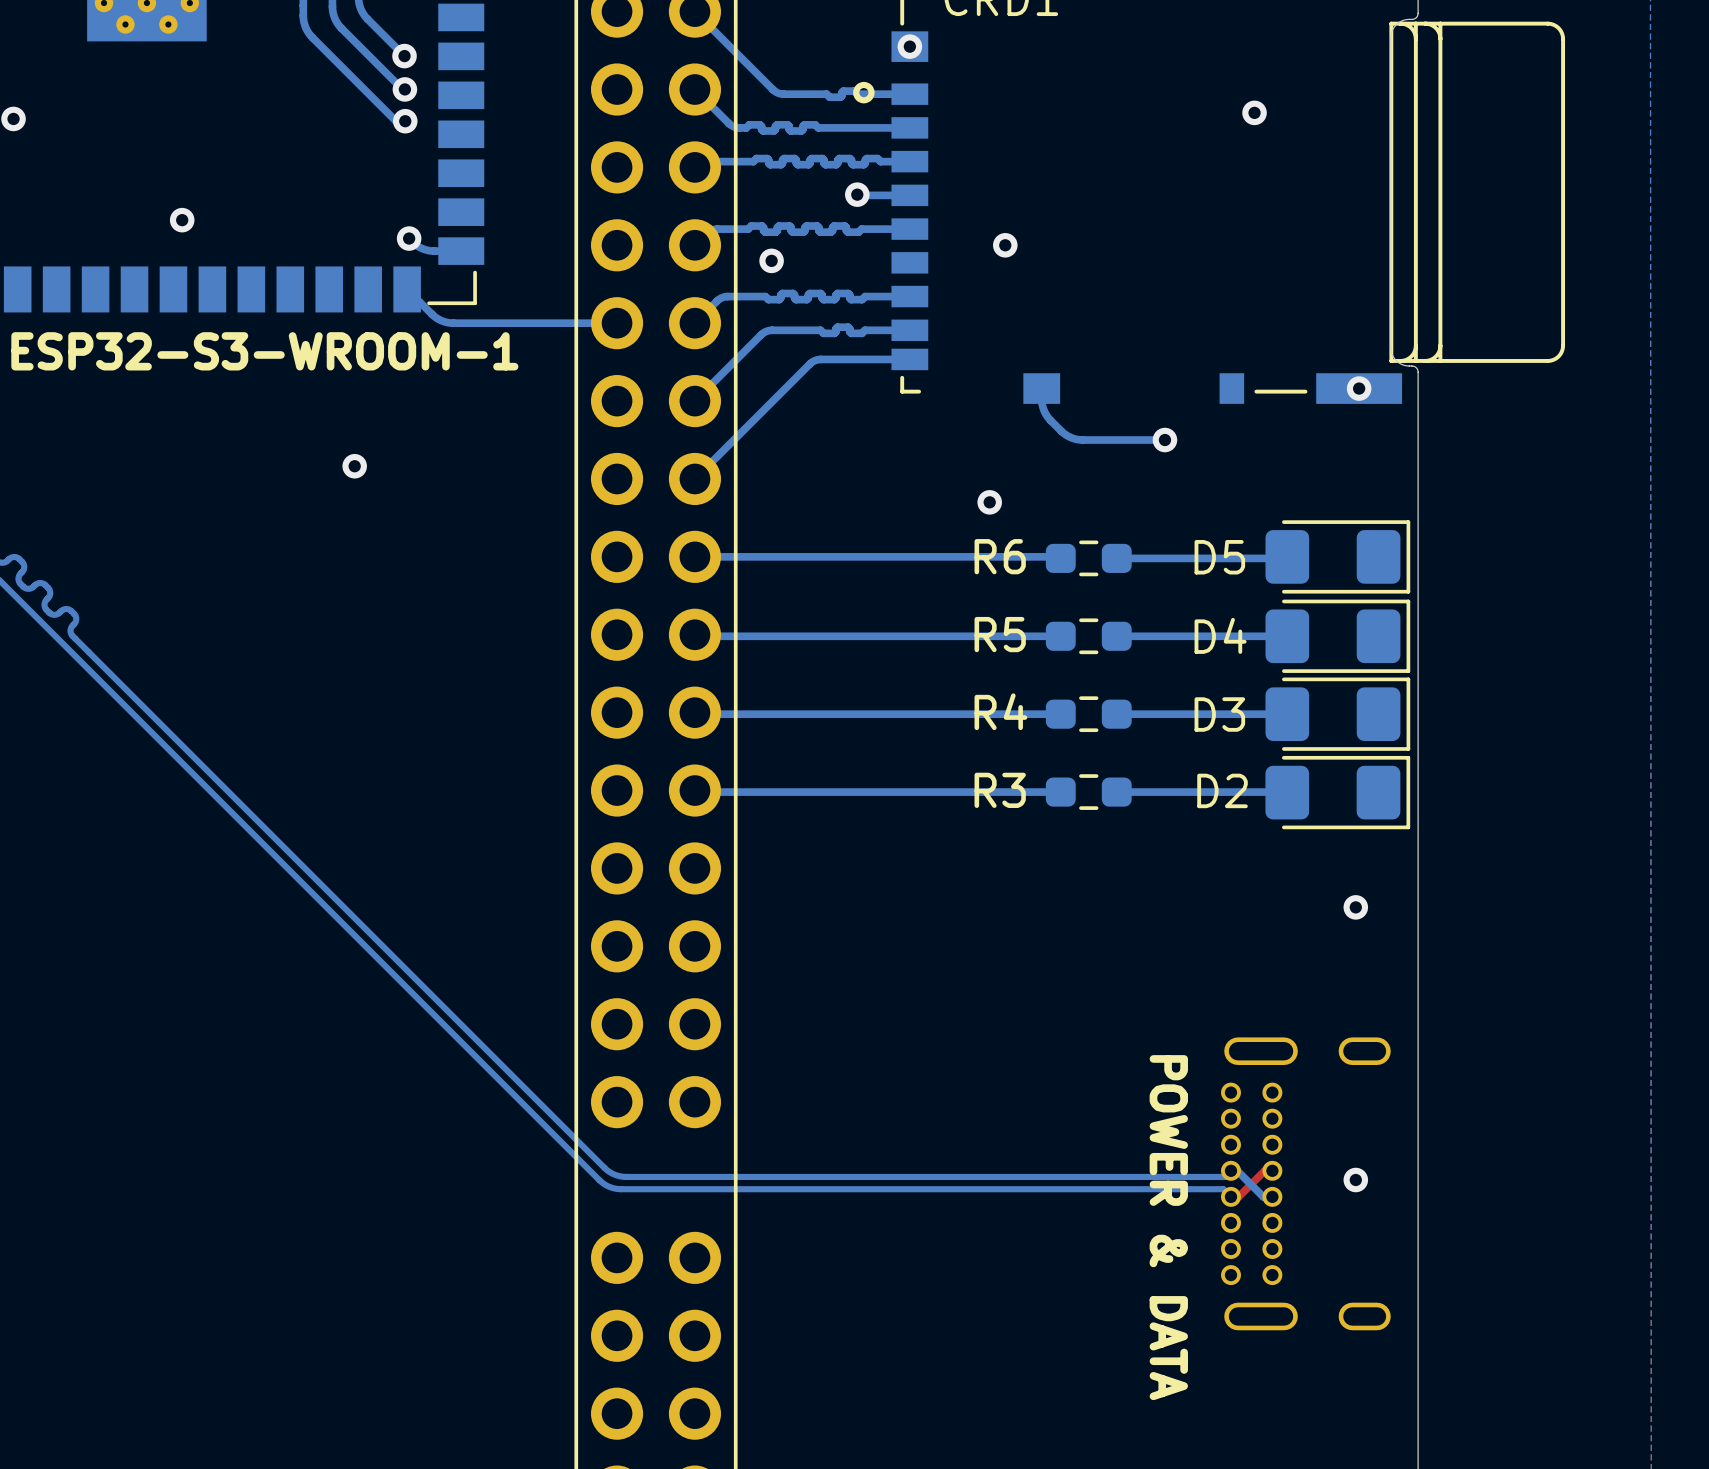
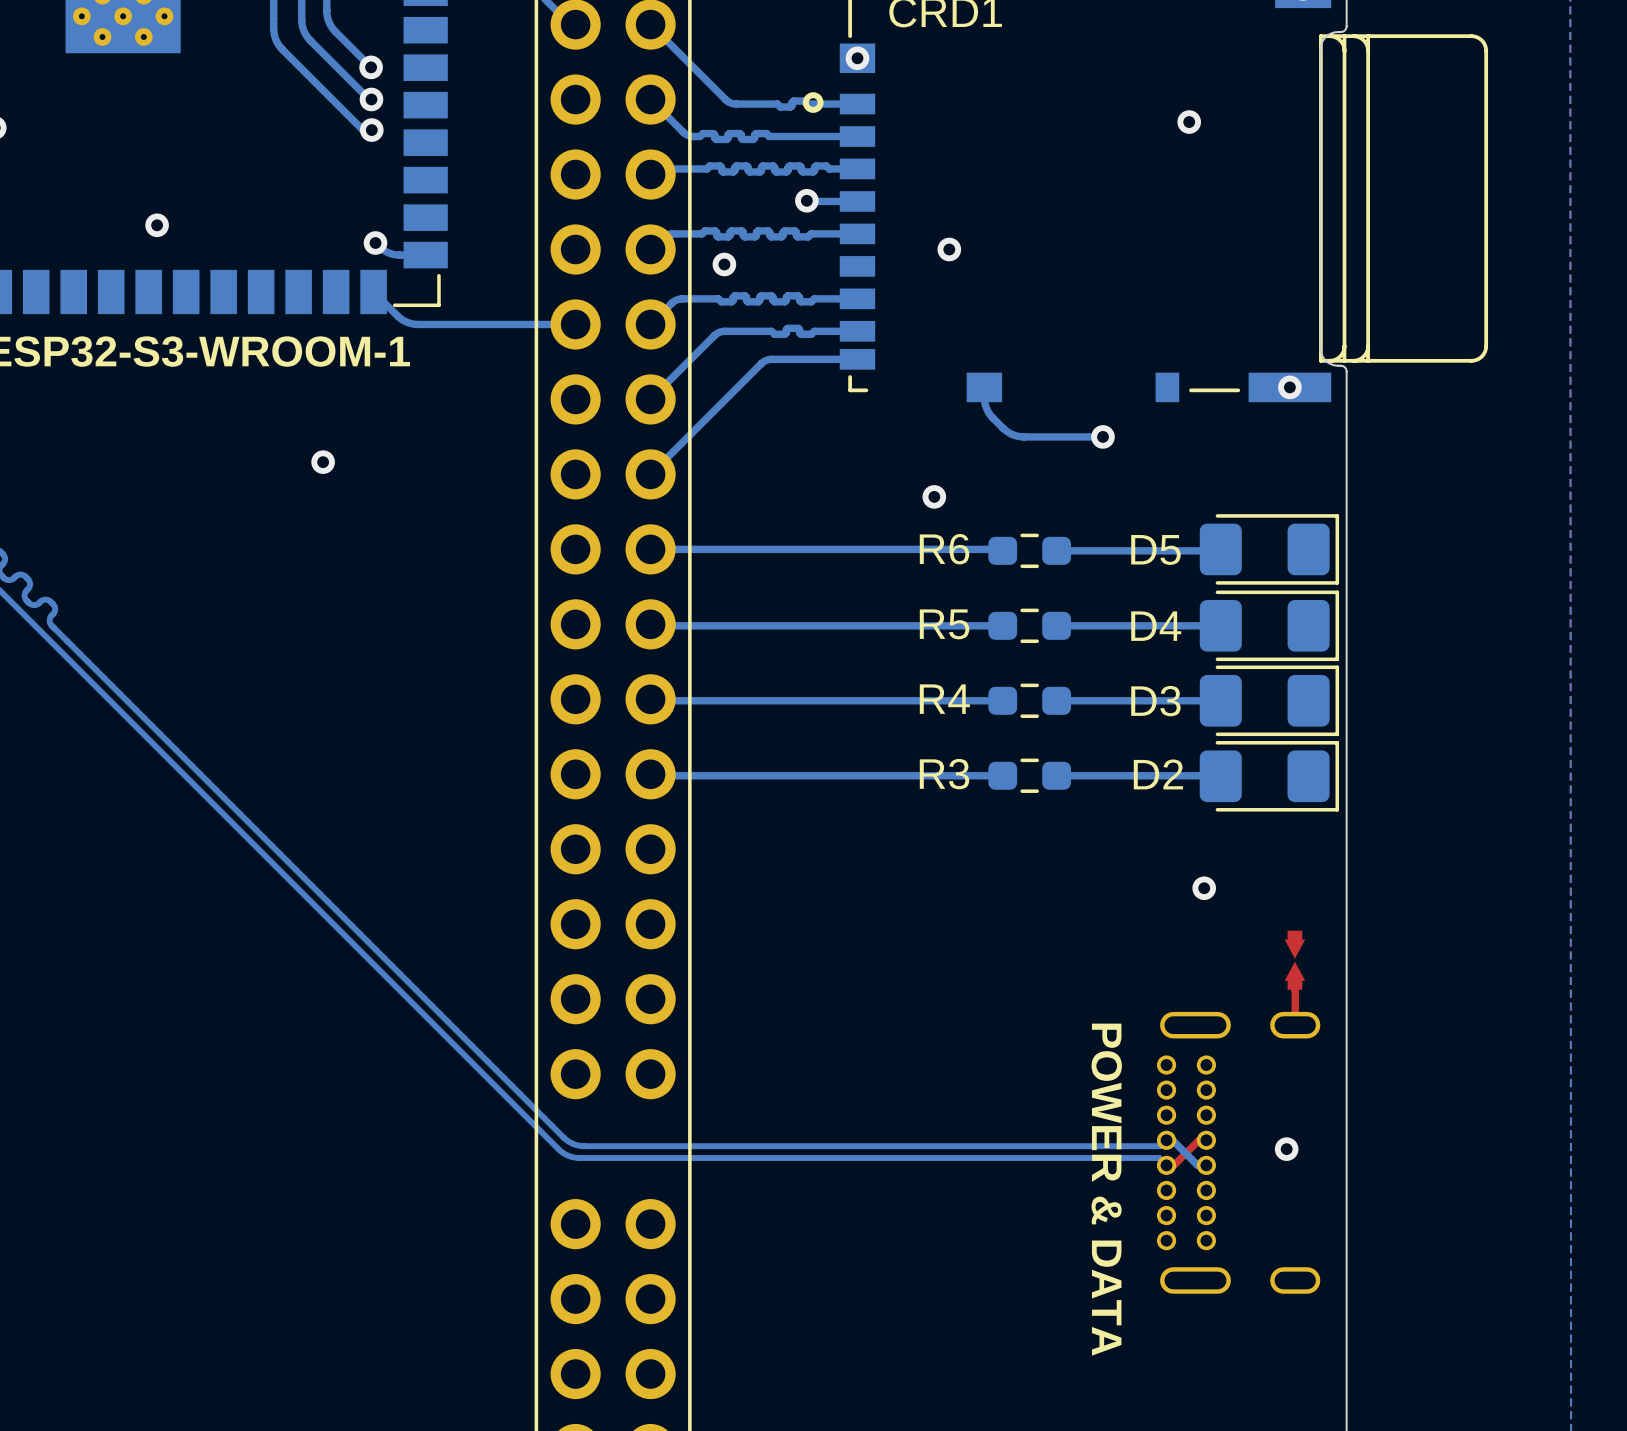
via position: (1355, 907) -> (1204, 888)
part: none -> (1294, 960)
top track: none -> (1295, 990) (1295, 1025)

